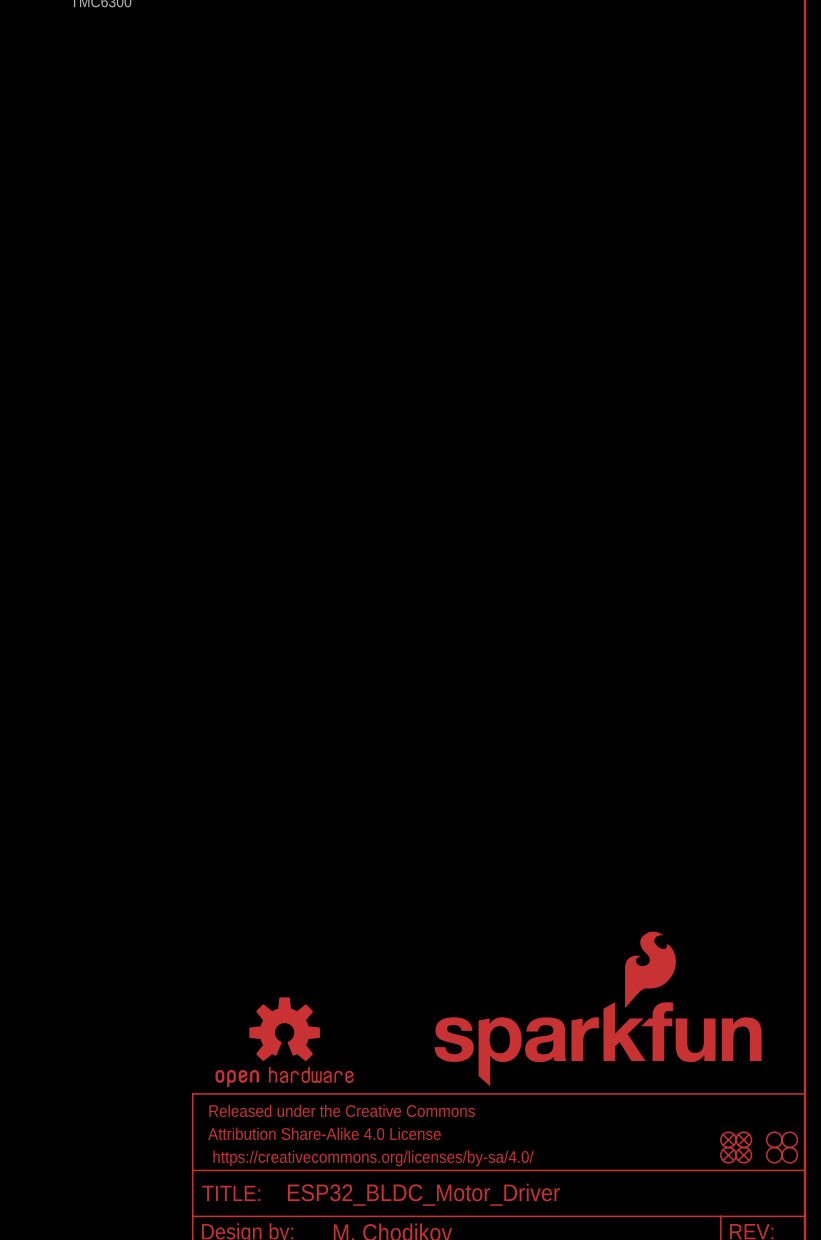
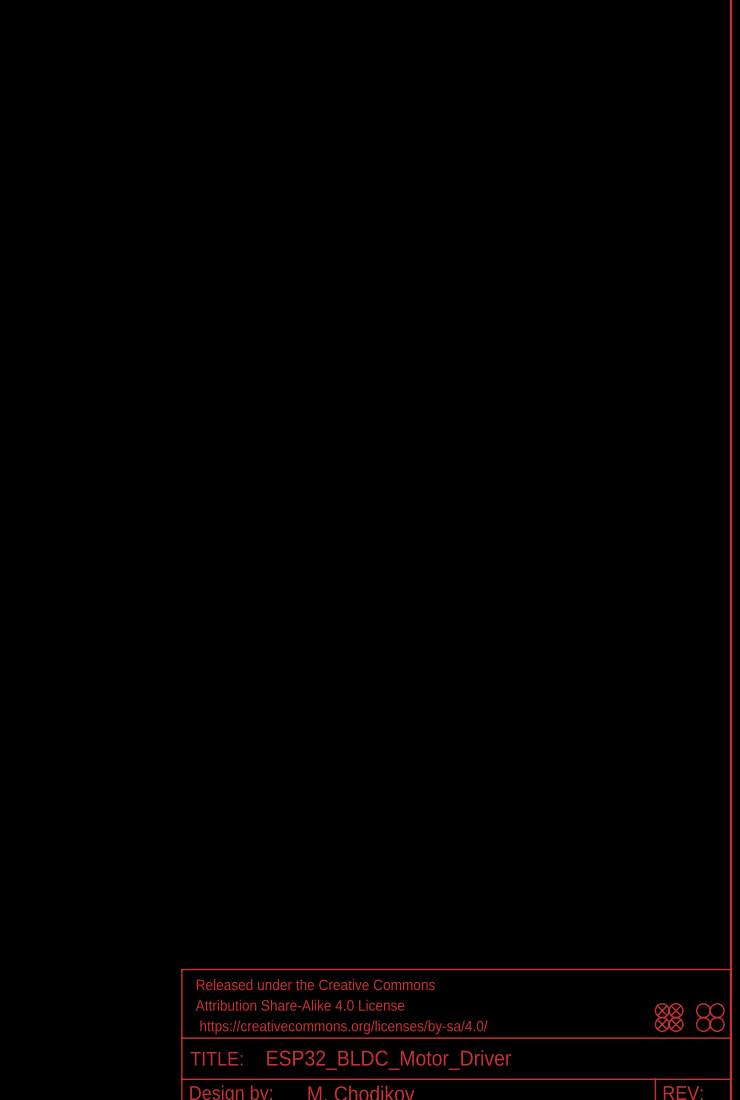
part: (650, 969) -> none
part: (284, 1042) -> none
part: (598, 1044) -> none

